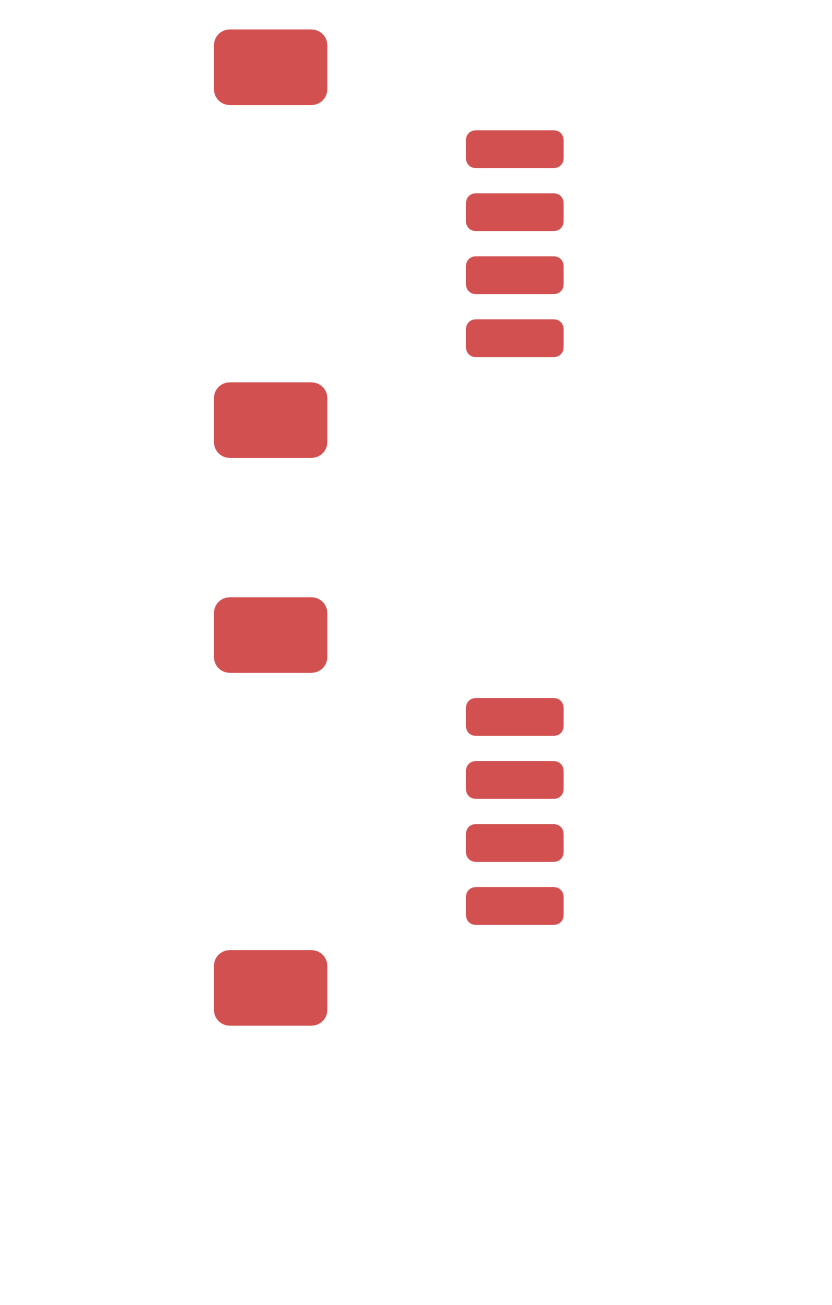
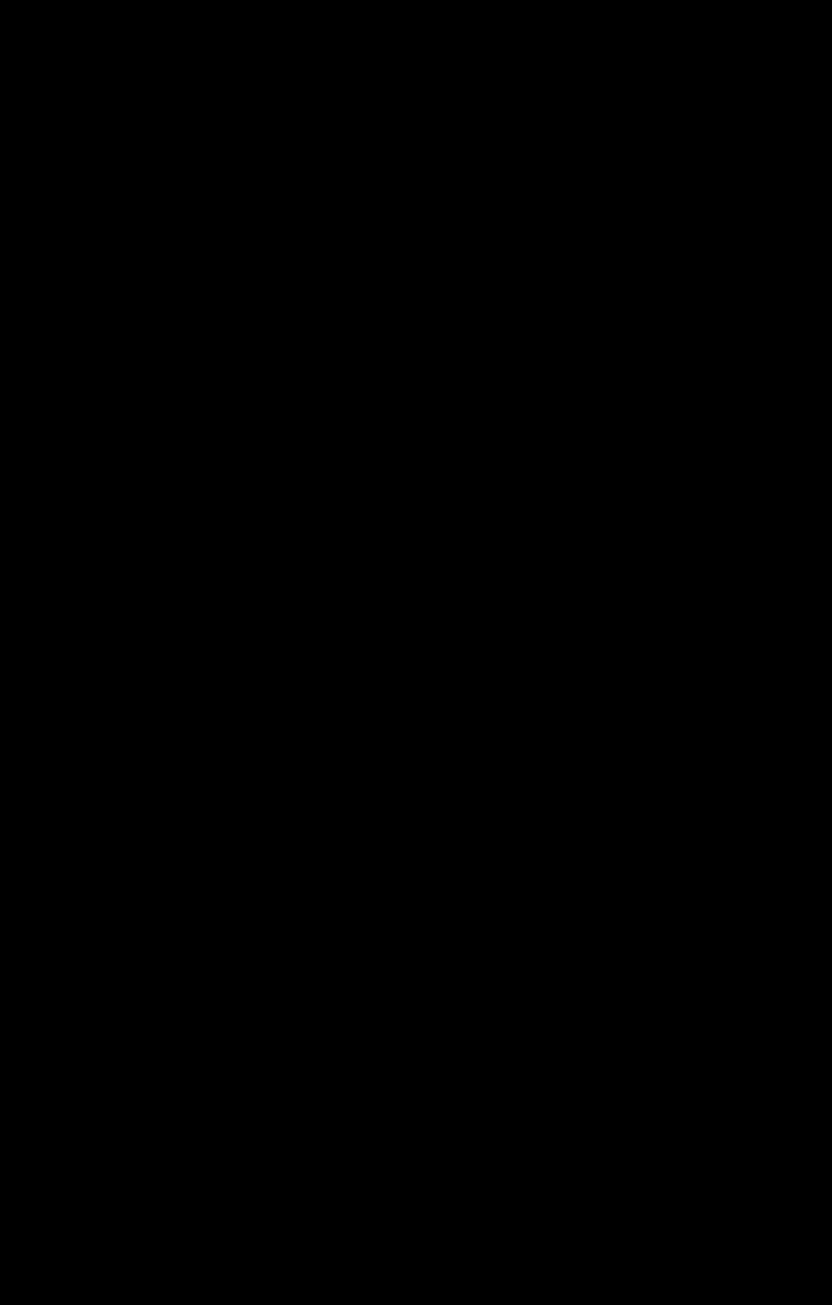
part: (388, 243) -> none
part: (388, 811) -> none

